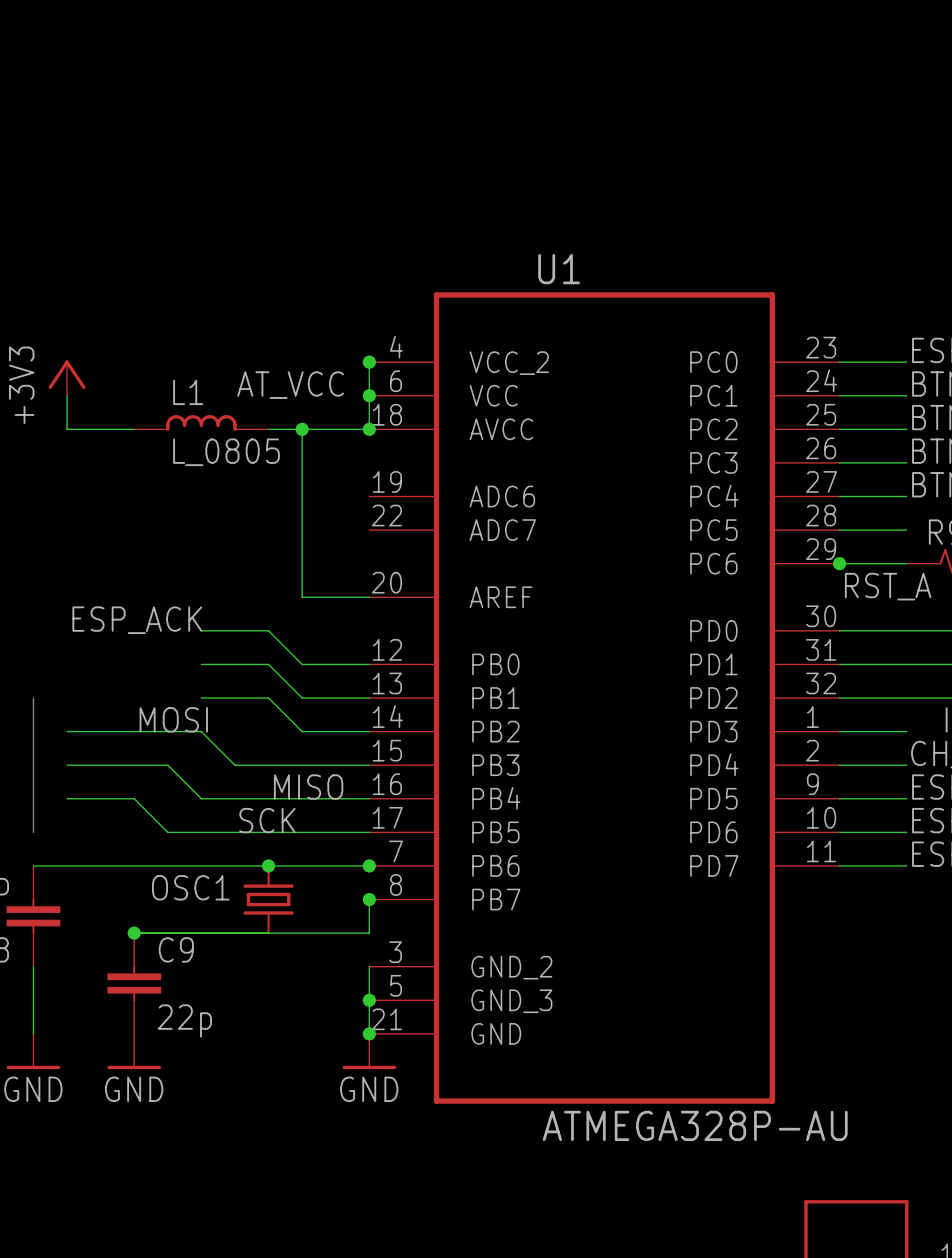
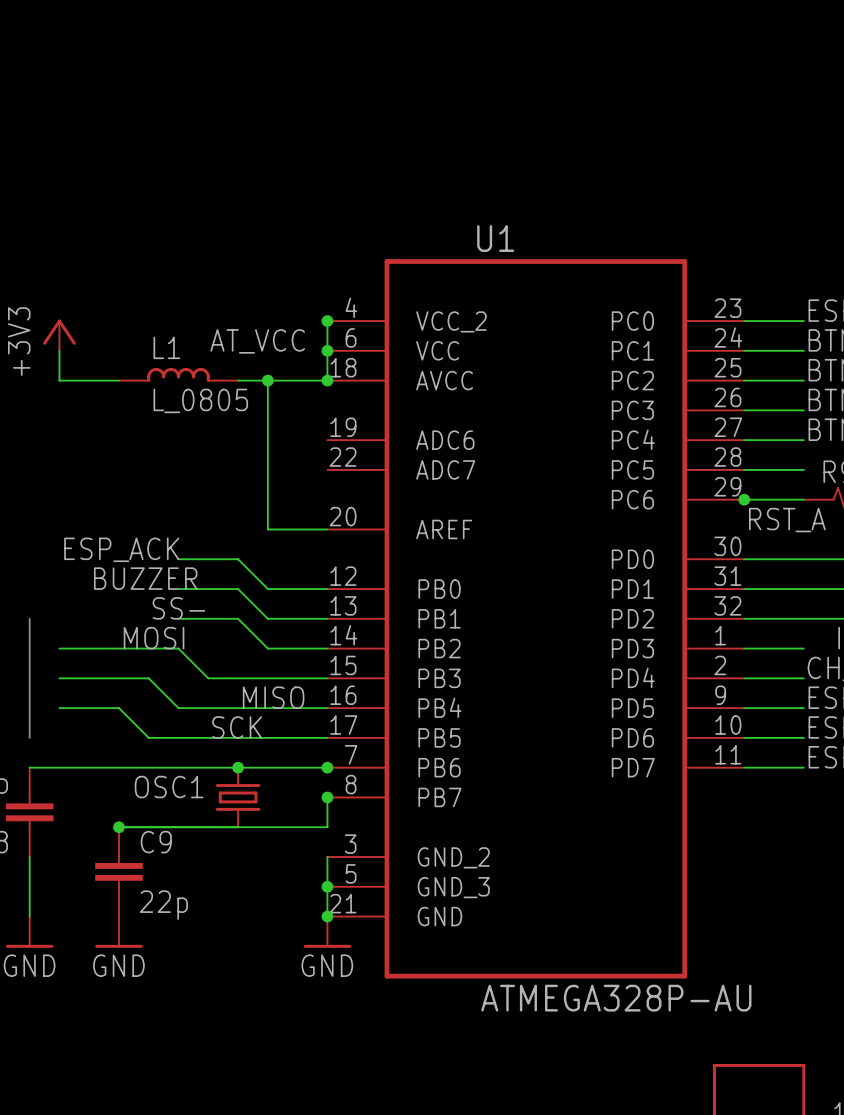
label: none -> BUZZER (145, 578)
label: none -> SS- (178, 608)

